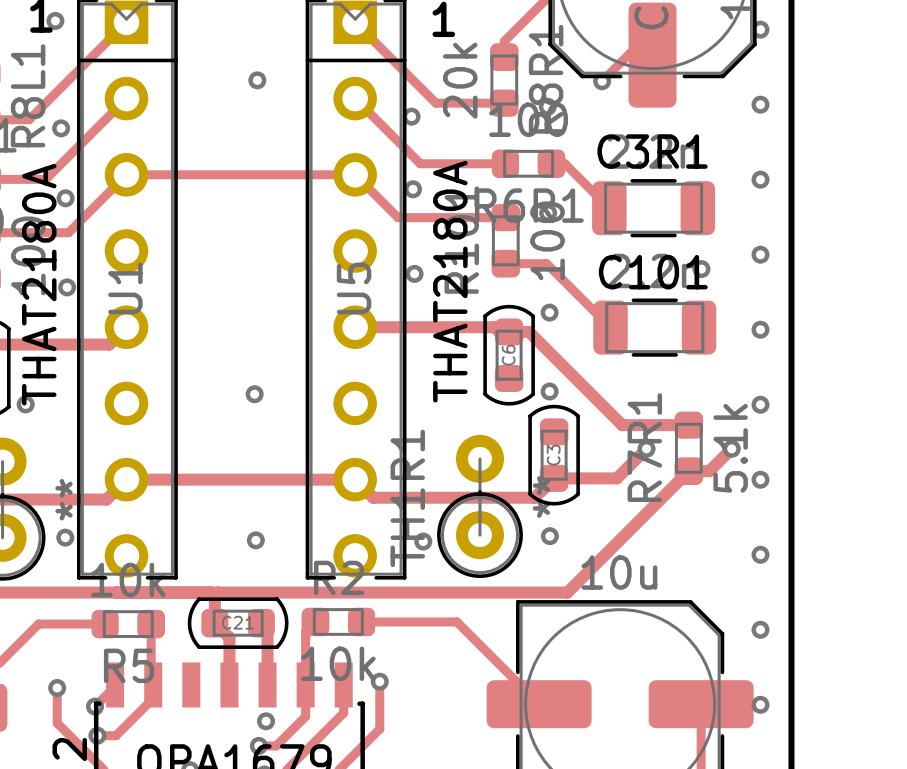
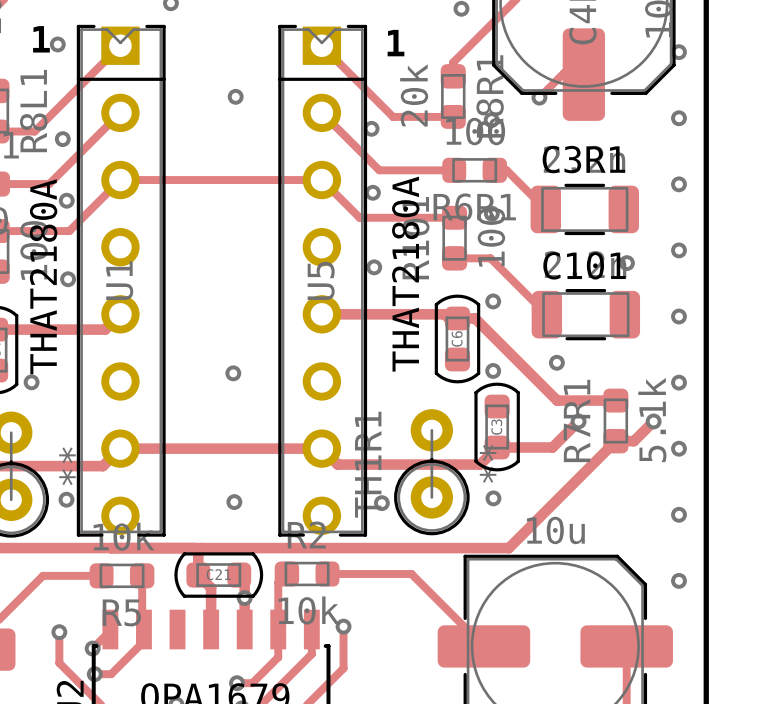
via: none -> (556, 362)
via: (760, 704) -> none
via position: (266, 721) -> (244, 598)

